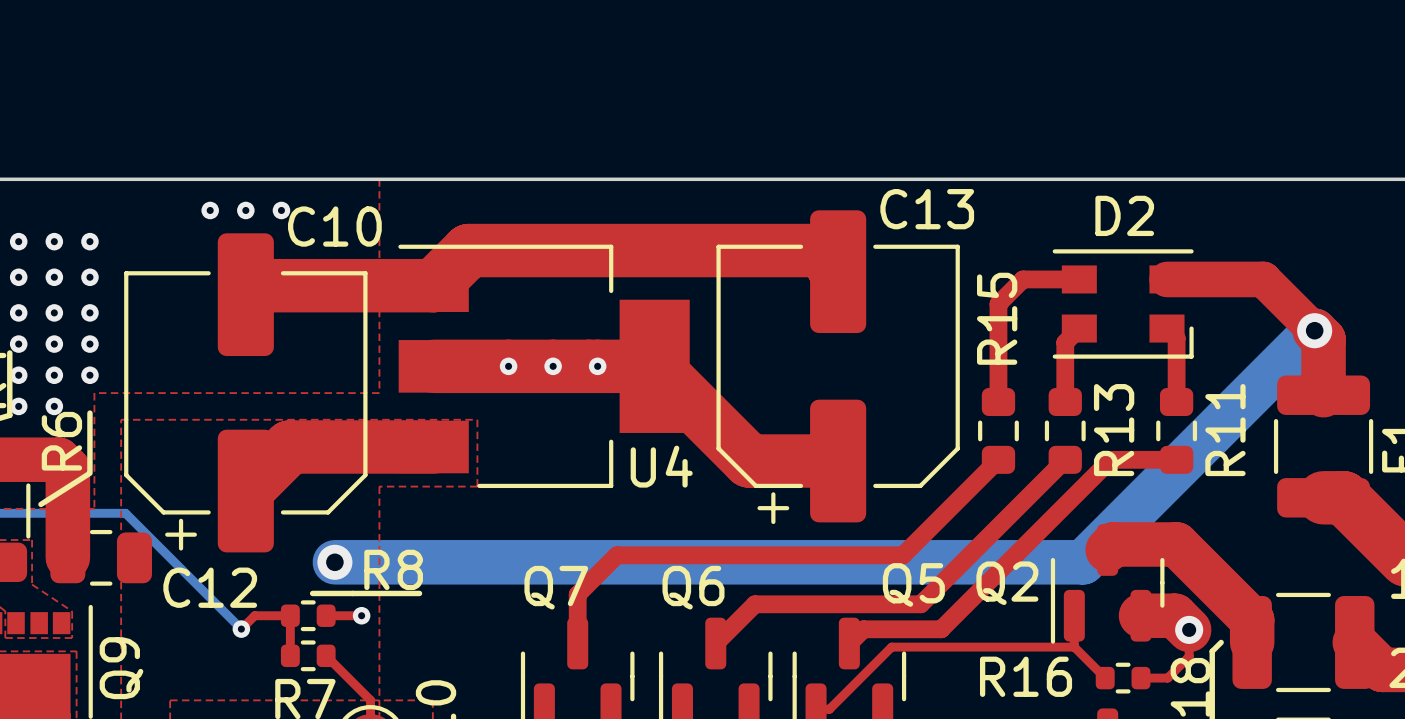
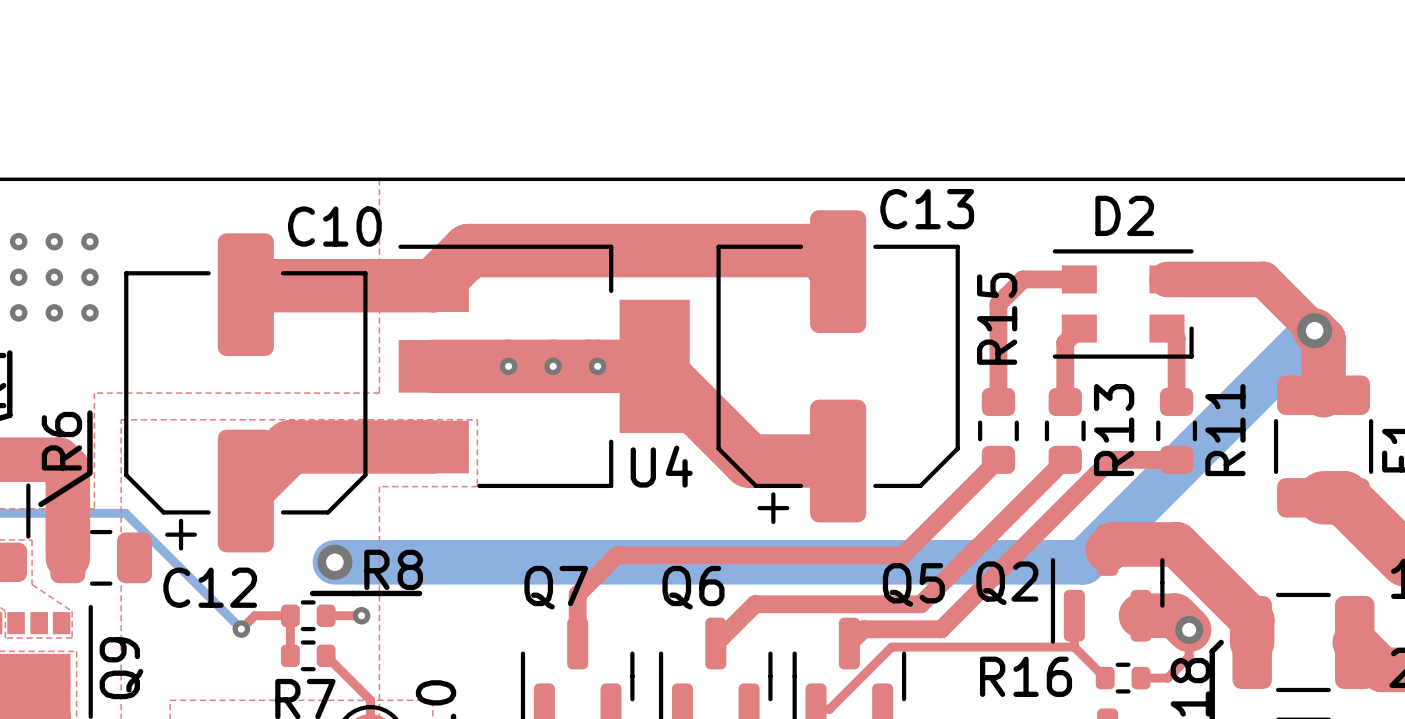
via: (210, 210) -> none
via: (245, 210) -> none
via: (281, 210) -> none
via: (18, 344) -> none
via: (54, 344) -> none
via: (89, 344) -> none
via: (18, 375) -> none
via: (54, 375) -> none
via: (89, 375) -> none
via: (18, 406) -> none
via: (54, 406) -> none

